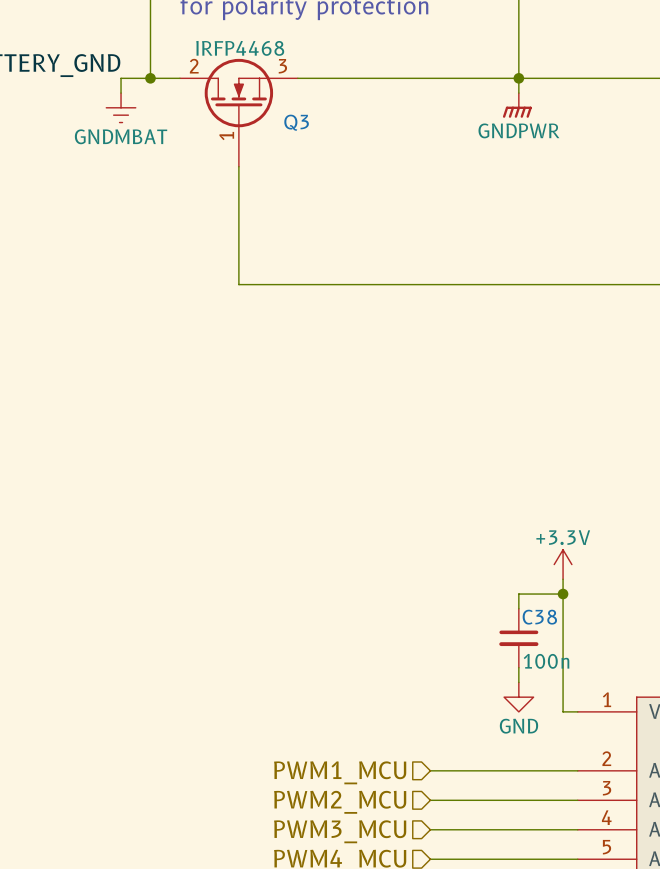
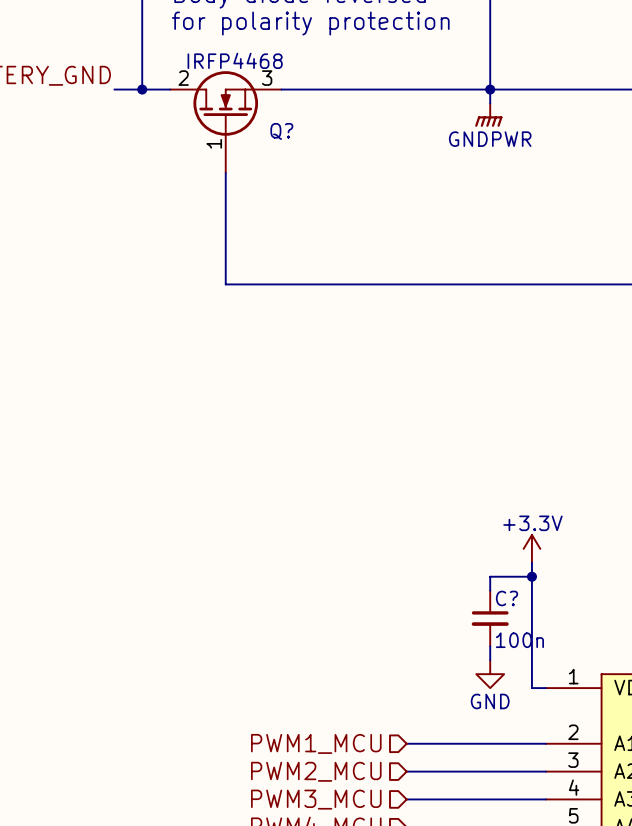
wire: (121, 78) (121, 93) -> none
power symbol: GNDMBAT (121, 107) -> none
Q3 name: Q3 (296, 122) -> Q? (281, 131)
C38 name: C38 (539, 617) -> C? (507, 598)

